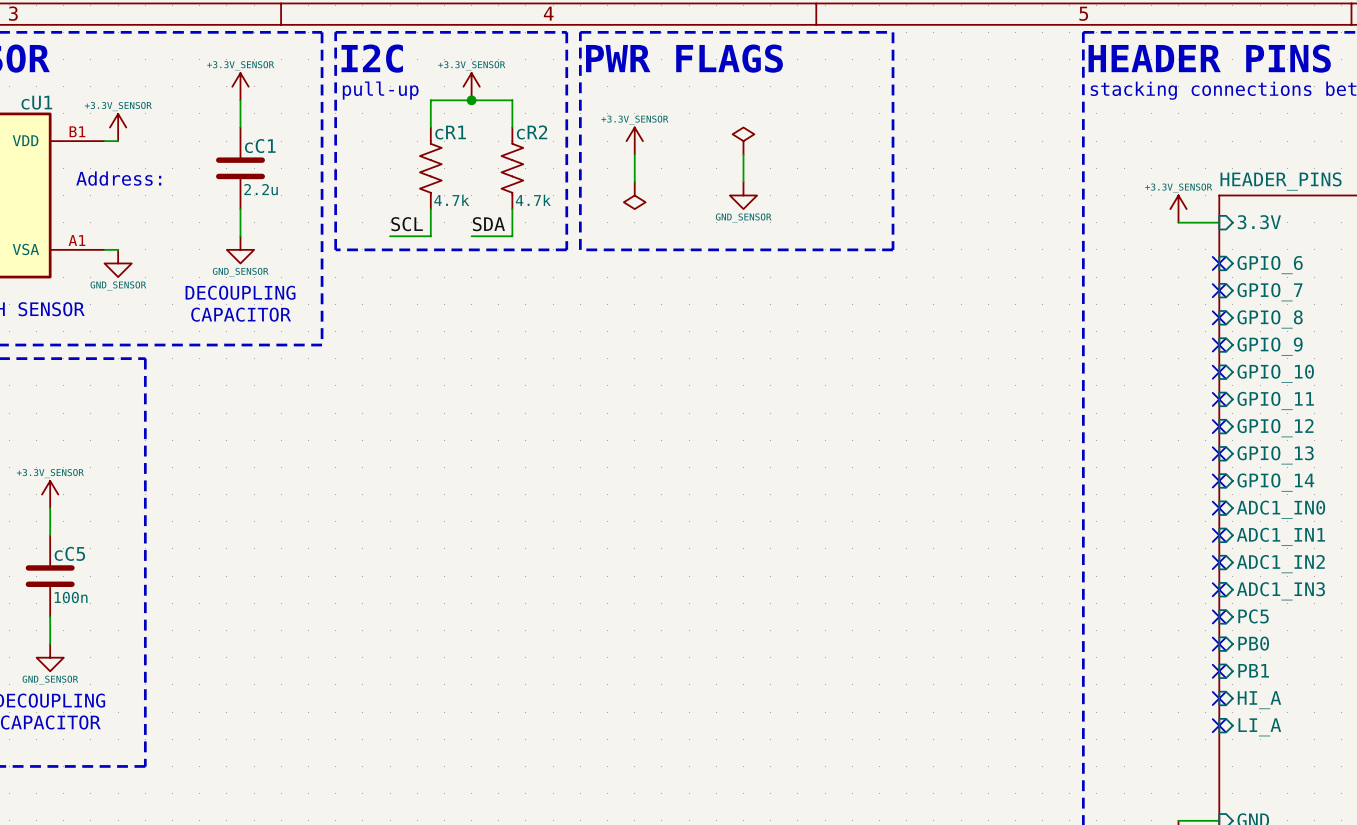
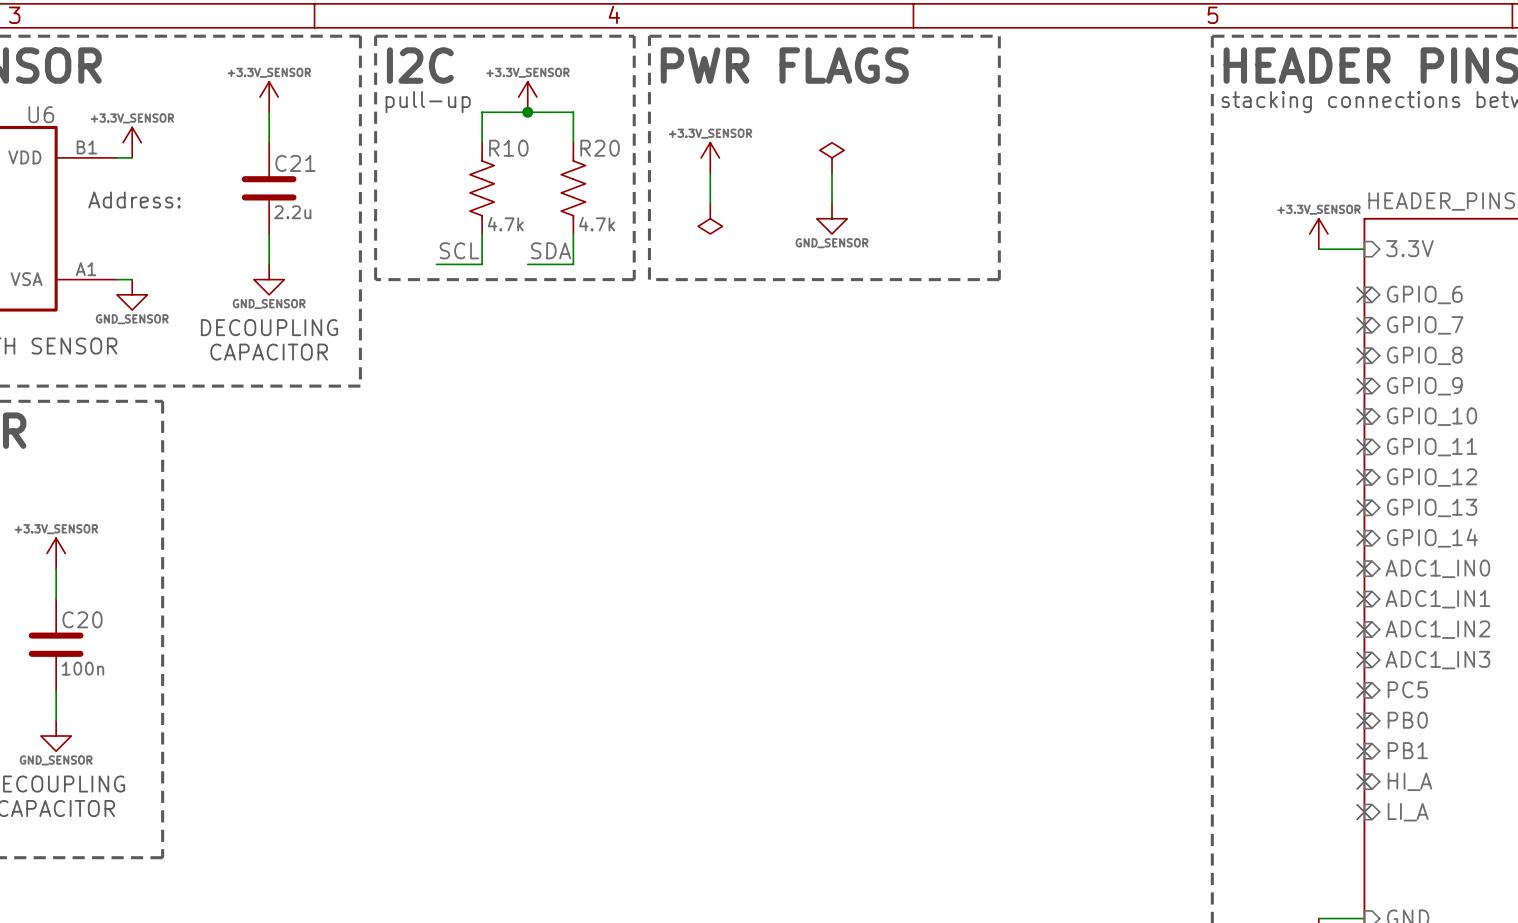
cU1 name: cU1 (36, 102) -> U6 (41, 114)
cR1 name: cR1 (450, 132) -> R10 (508, 148)
cR2 name: cR2 (532, 132) -> R20 (600, 148)
cC1 name: cC1 (260, 146) -> C21 (295, 163)
cC5 name: cC5 (69, 553) -> C20 (82, 619)

